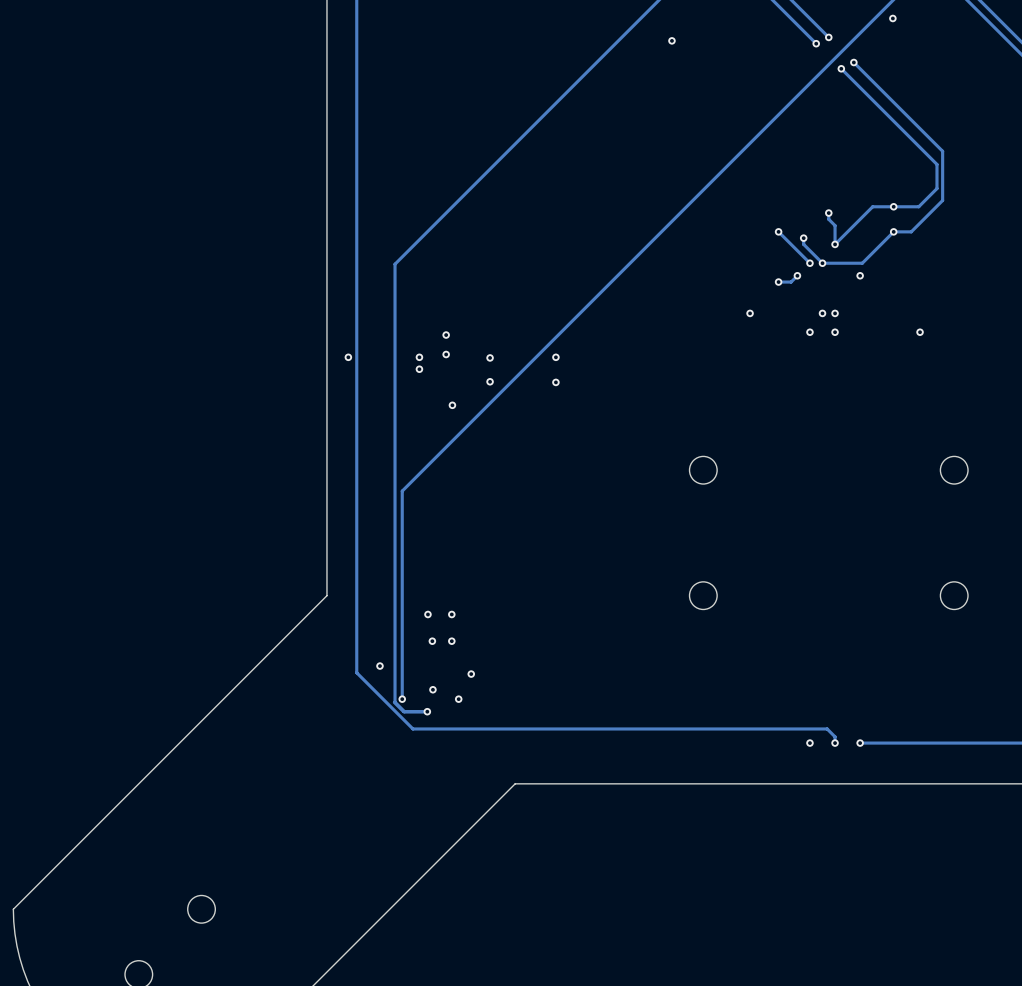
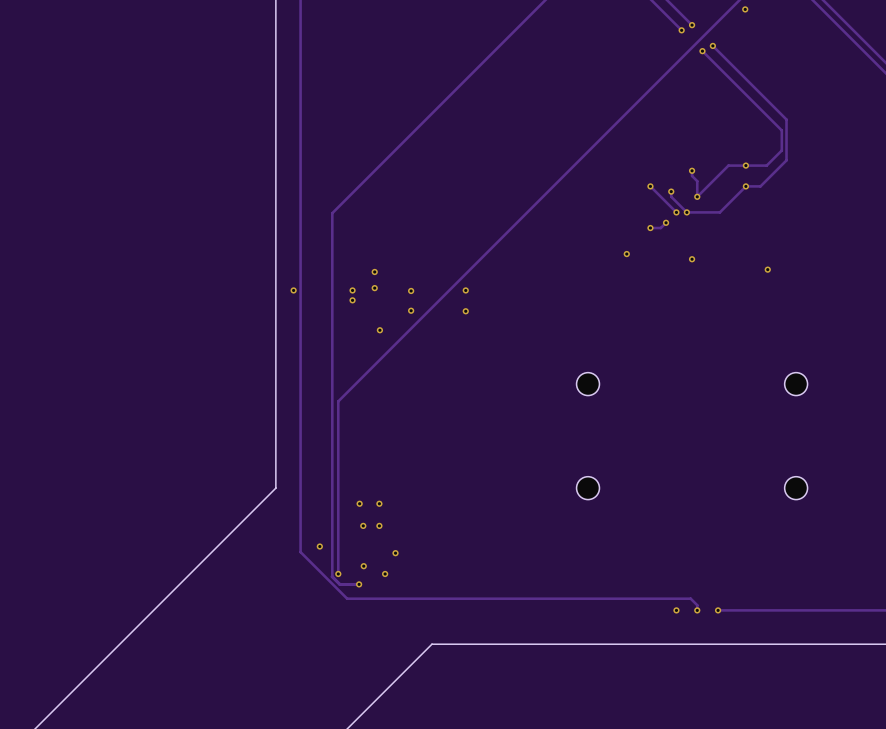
via: (671, 40) -> none
via: (860, 275) -> none
via: (822, 313) -> none
via: (835, 313) -> none
via: none -> (692, 259)
via: (809, 332) -> none
via: (835, 332) -> none

